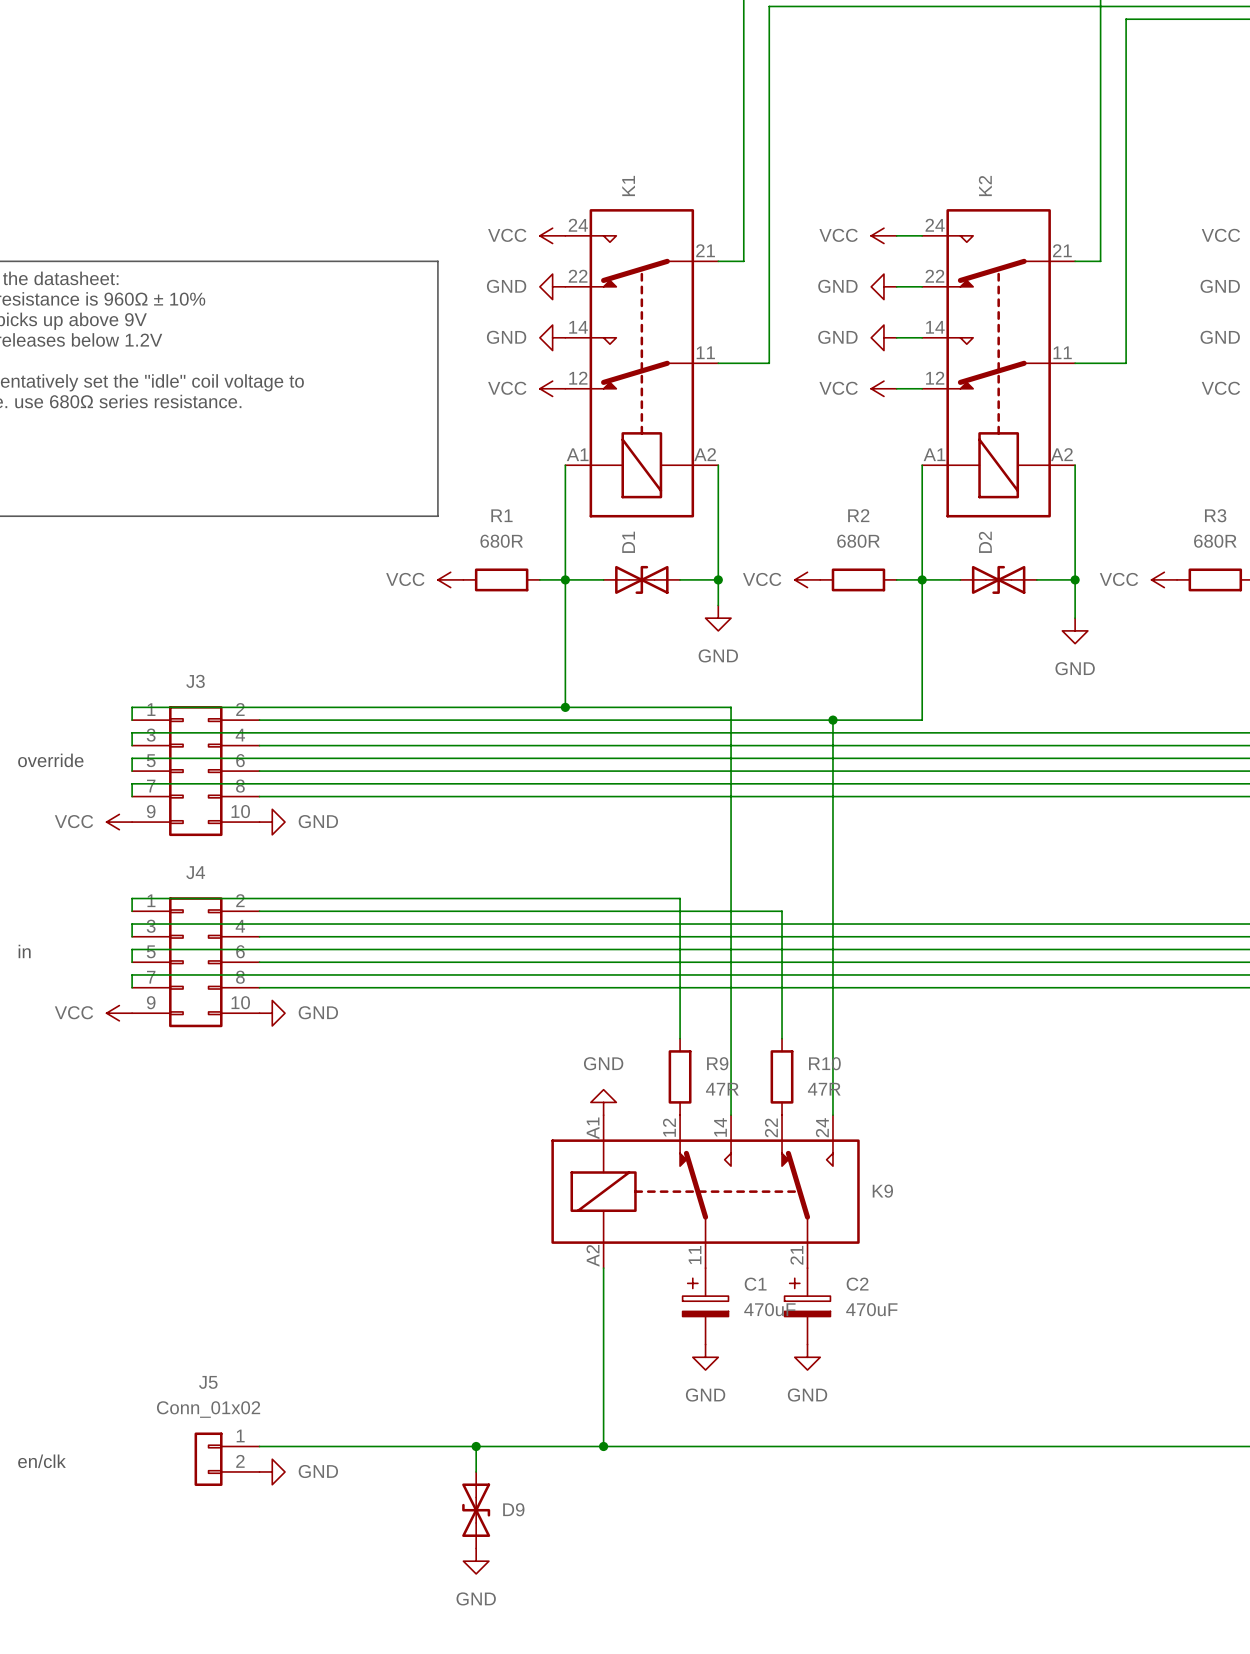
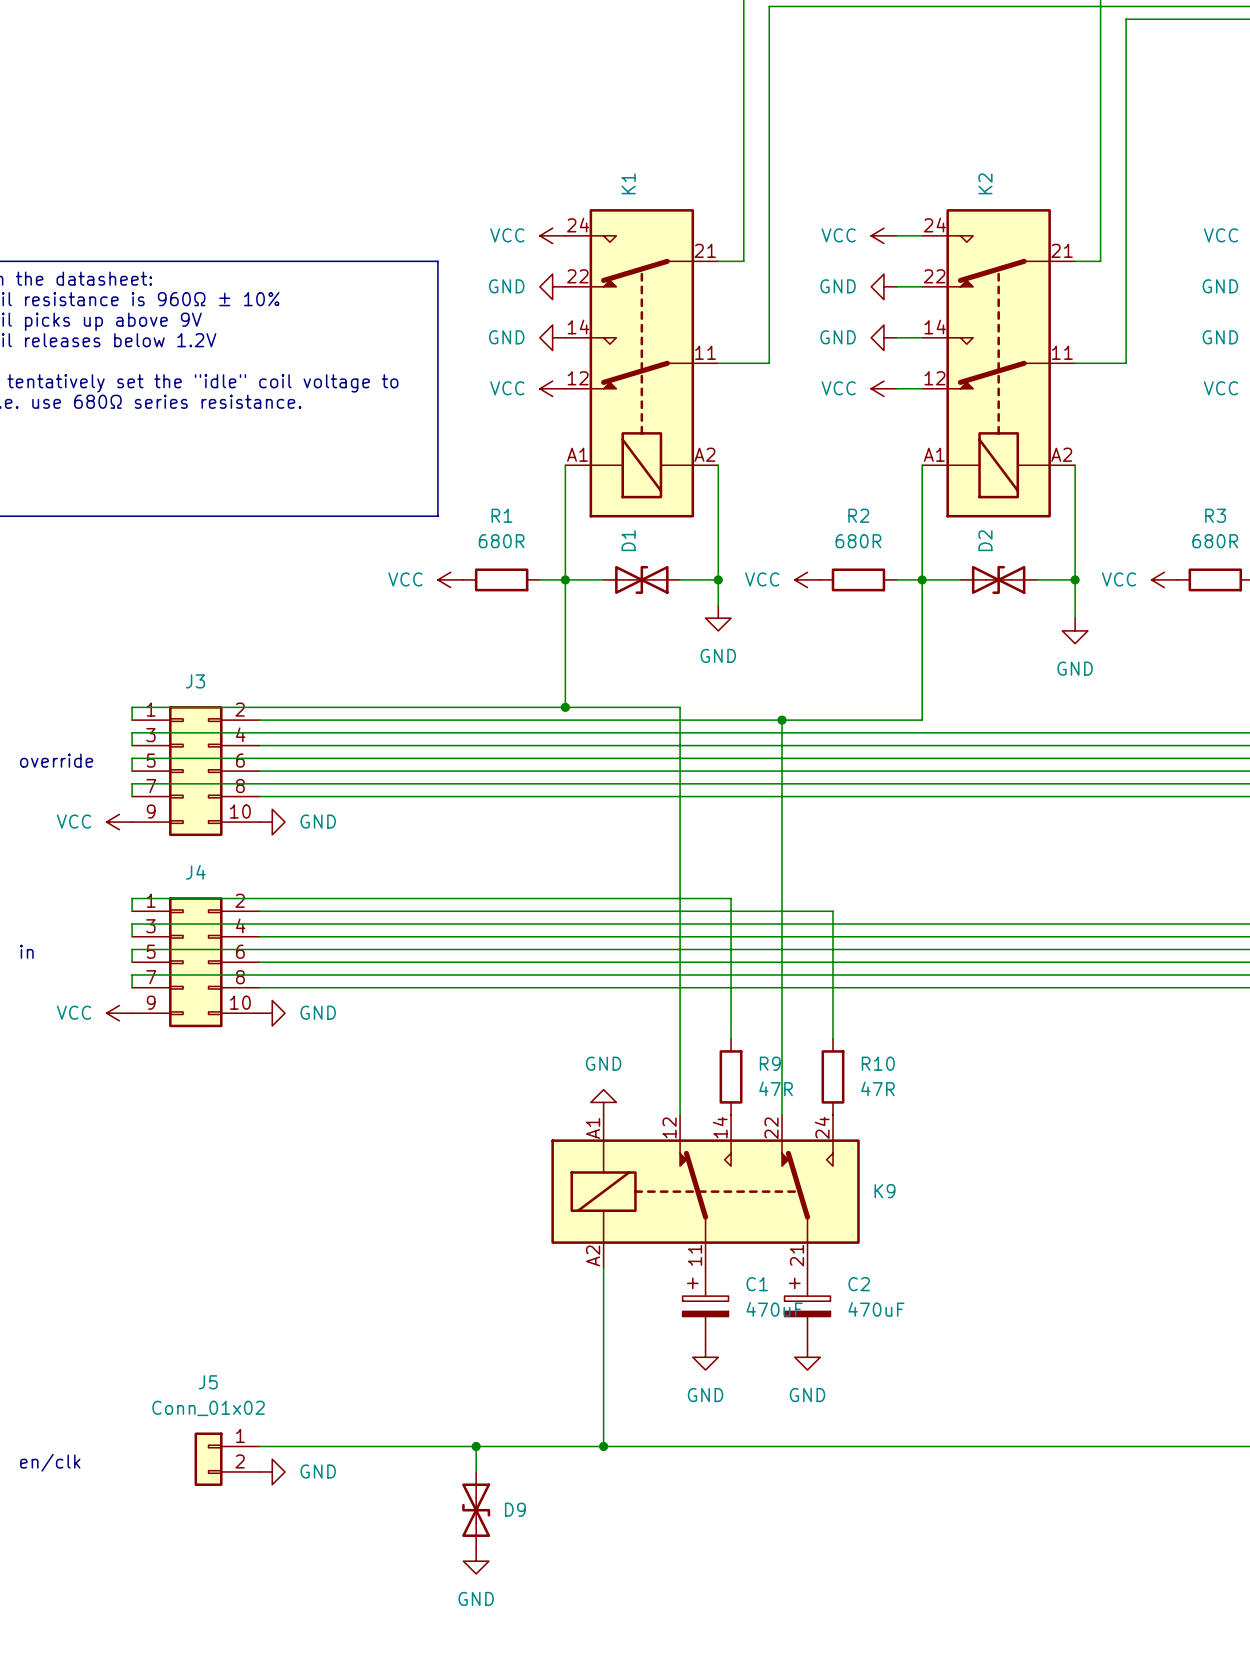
wire: (680, 707) (731, 707) (731, 898) -> (680, 707) (680, 898) (731, 898)
wire: (832, 720) (832, 911) -> (782, 720) (782, 911) (832, 911)
junction position: (832, 720) -> (782, 720)
wire: (731, 1038) (731, 1115) -> (680, 1038) (680, 1115)
wire: (832, 1038) (832, 1115) -> (782, 1038) (782, 1115)
R9 position: (680, 1076) -> (731, 1076)
R10 position: (782, 1076) -> (832, 1076)

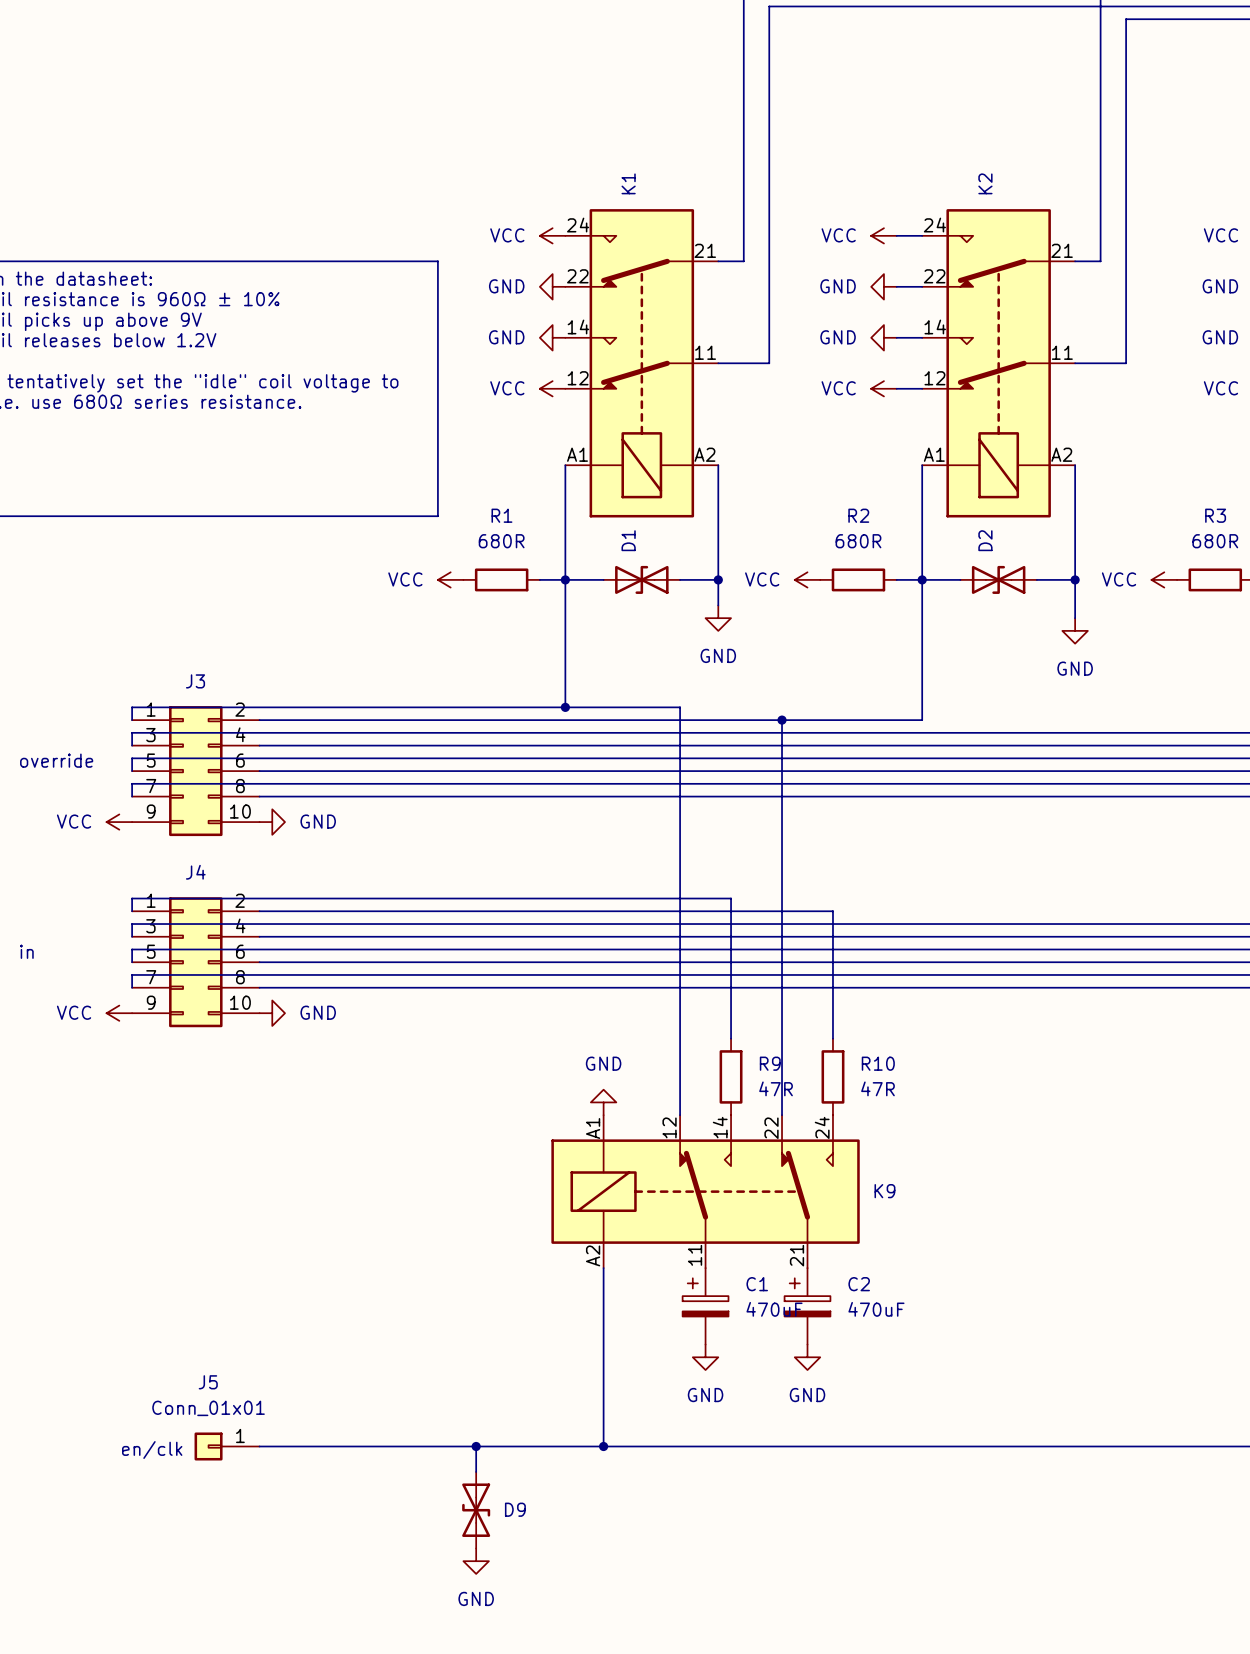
J5 value: Conn_01x02 (208, 1408) -> Conn_01x01 (208, 1408)
J5 symbol: [194, 1432, 260, 1487] -> [194, 1432, 260, 1461]
text position: en/clk (50, 1462) -> en/clk (152, 1450)
power symbol: GND (272, 1471) -> none

